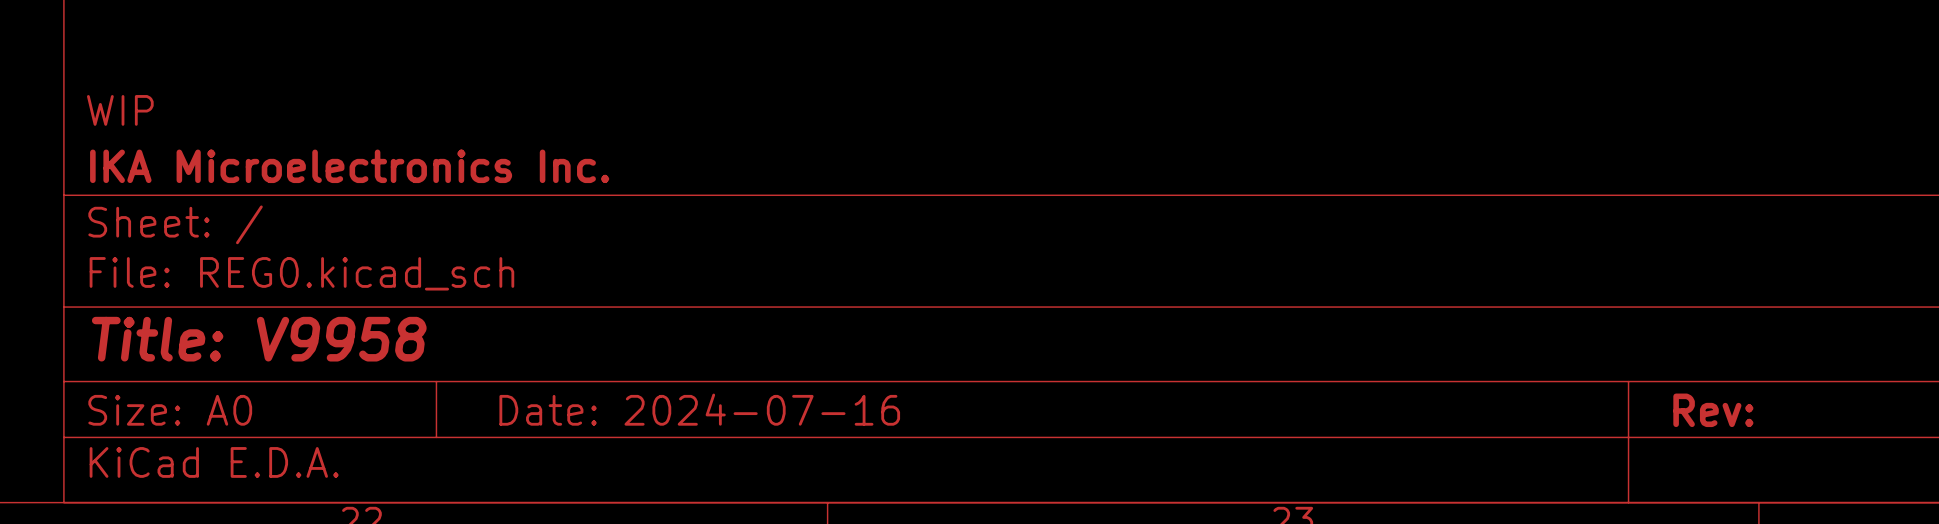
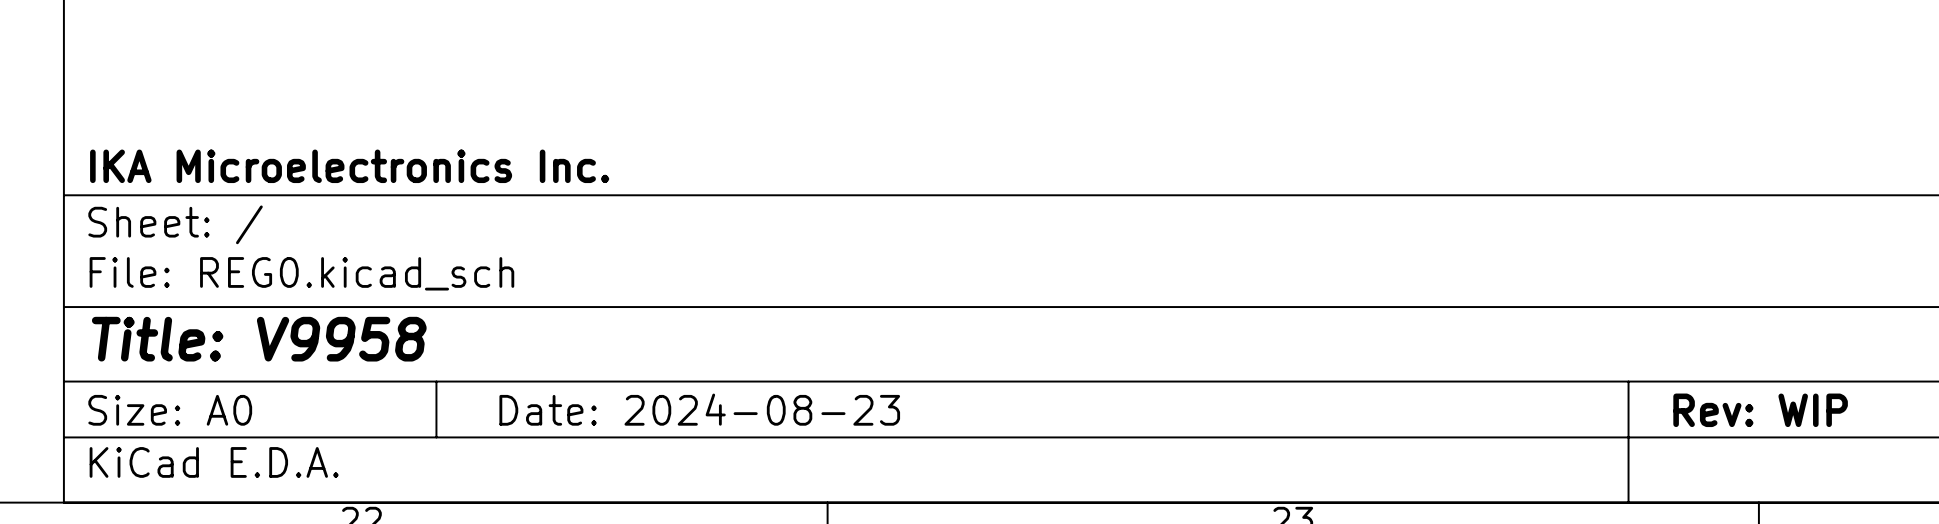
title block: WIP (120, 110) -> none
title block: Date: 2024-07-16 (699, 409) -> Date: 2024-08-23 (699, 409)
title block: Rev: (1713, 410) -> Rev: WIP (1760, 410)

